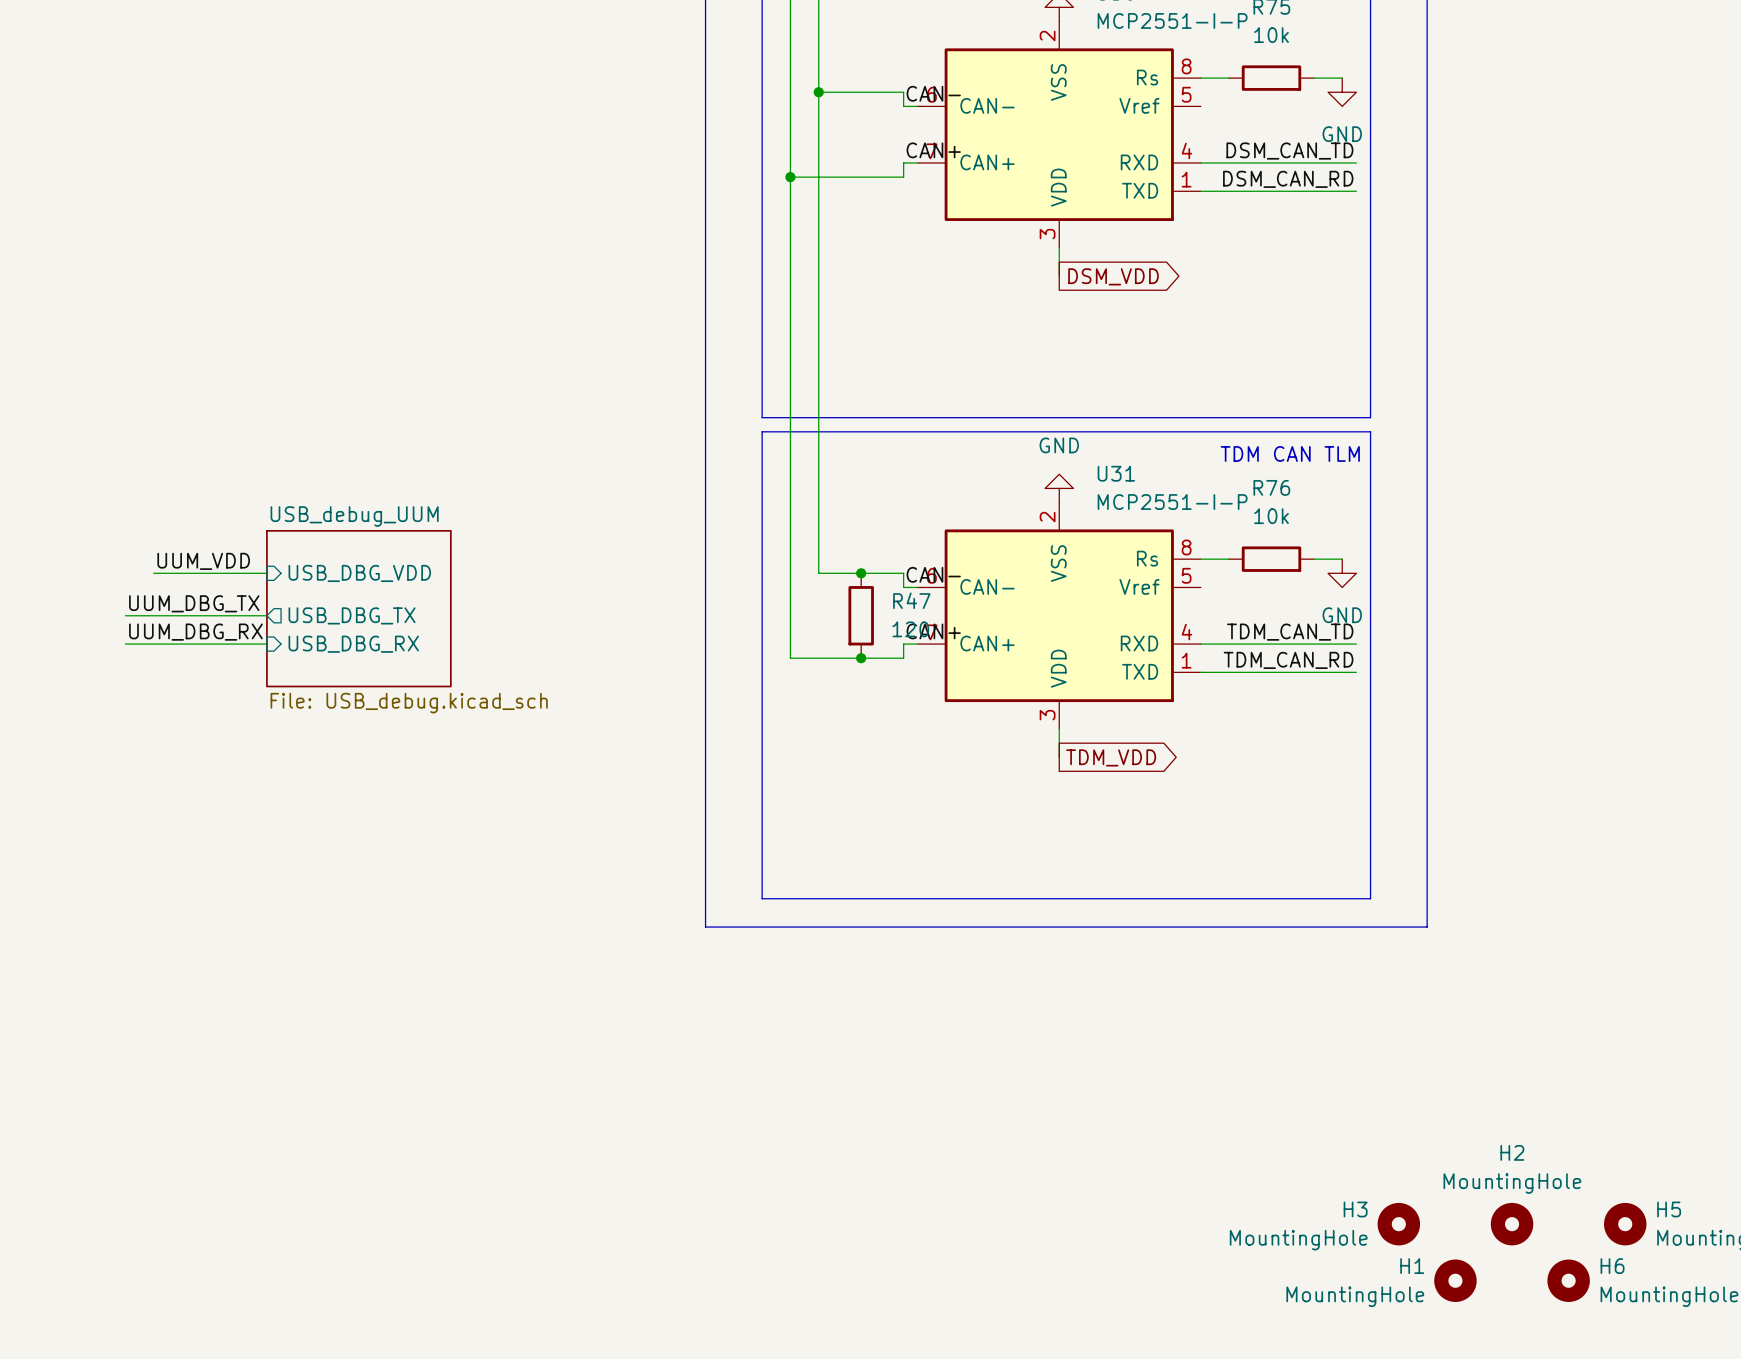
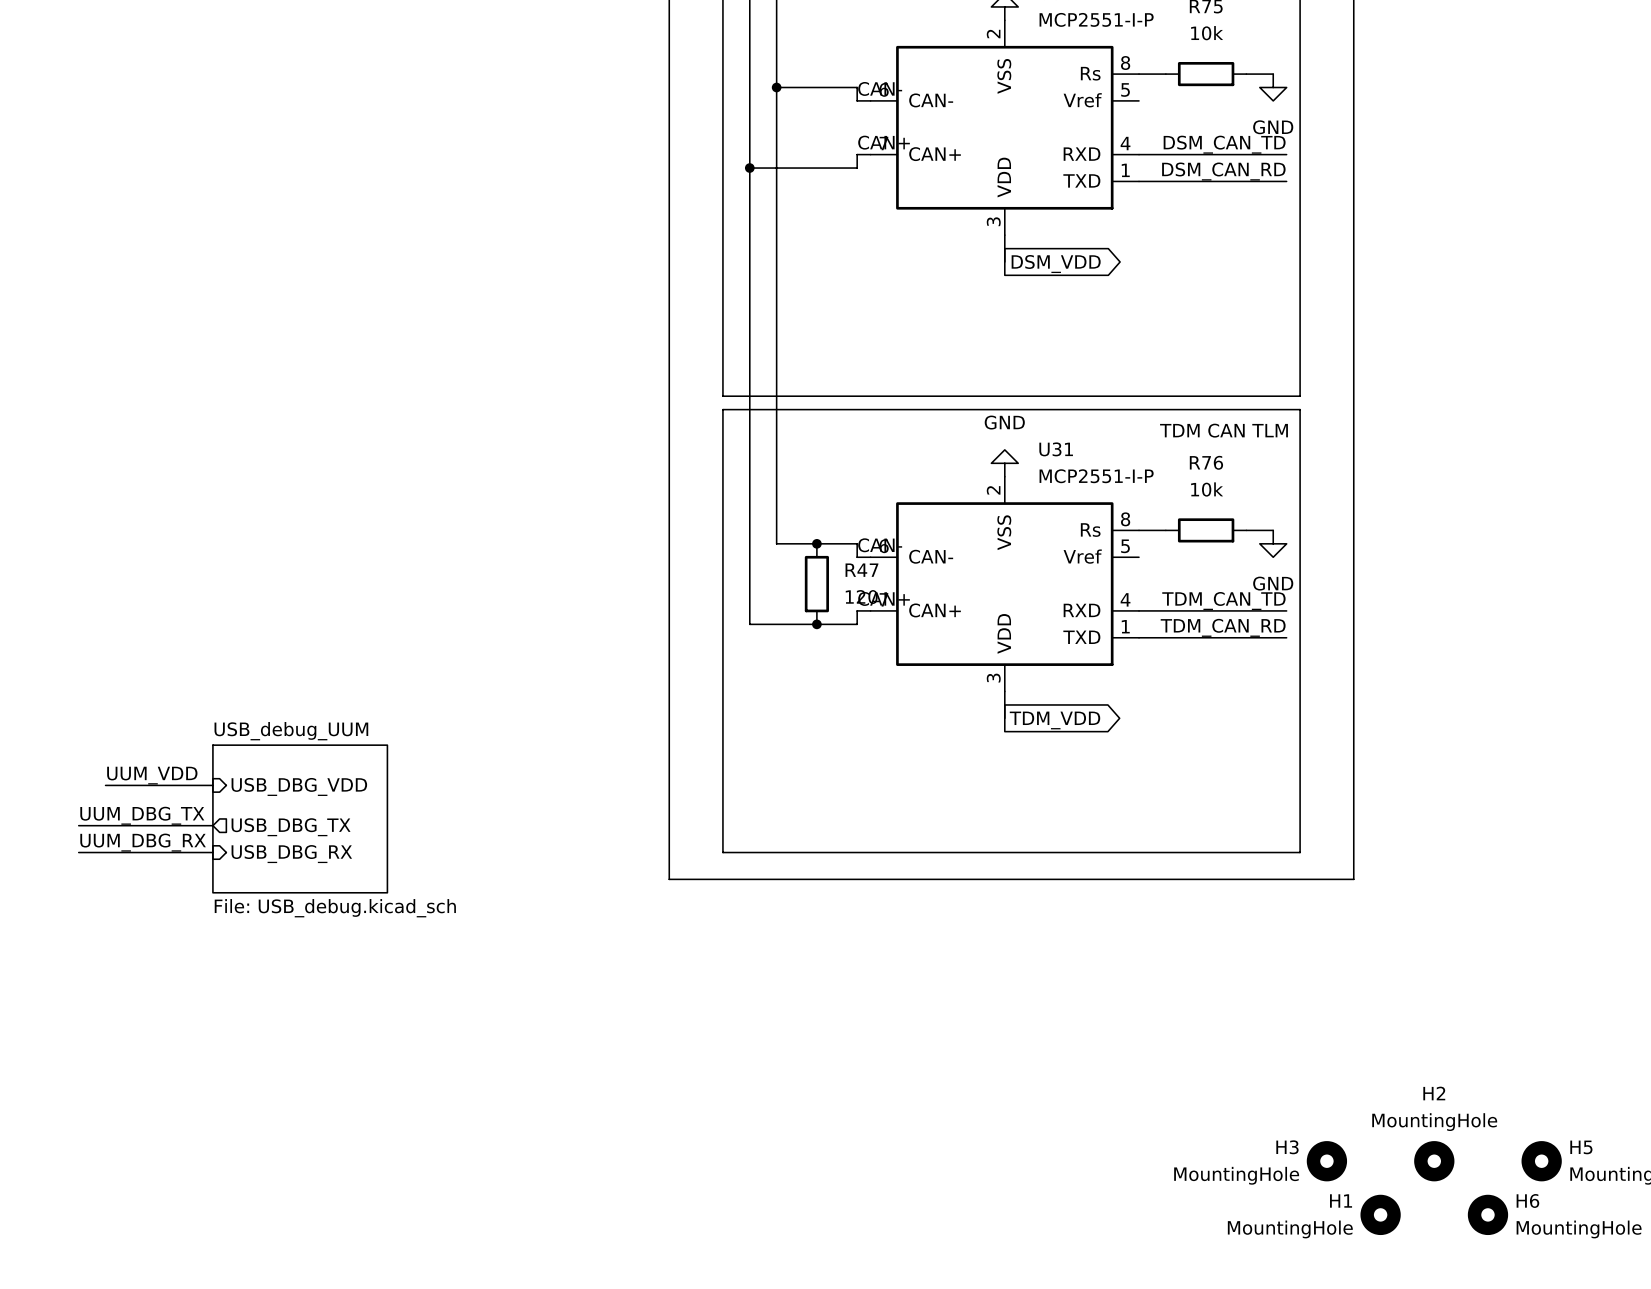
label position: UUM_VDD (203, 561) -> UUM_VDD (152, 775)
wire: (153, 573) (266, 573) -> (105, 785) (212, 785)
sheet pin position: USB_DBG_VDD (359, 573) -> USB_DBG_VDD (299, 786)
label position: UUM_DBG_TX (194, 603) -> UUM_DBG_TX (142, 815)
sheet USB_debug_UUM position: (358, 608) -> (300, 818)
wire: (125, 615) (266, 615) -> none
sheet pin position: USB_DBG_TX (352, 615) -> USB_DBG_TX (291, 827)
label position: UUM_DBG_RX (195, 632) -> UUM_DBG_RX (143, 842)
wire: (125, 644) (266, 644) -> (78, 825) (212, 825)
sheet pin position: USB_DBG_RX (353, 644) -> USB_DBG_RX (291, 854)
wire: none -> (78, 852) (212, 852)

